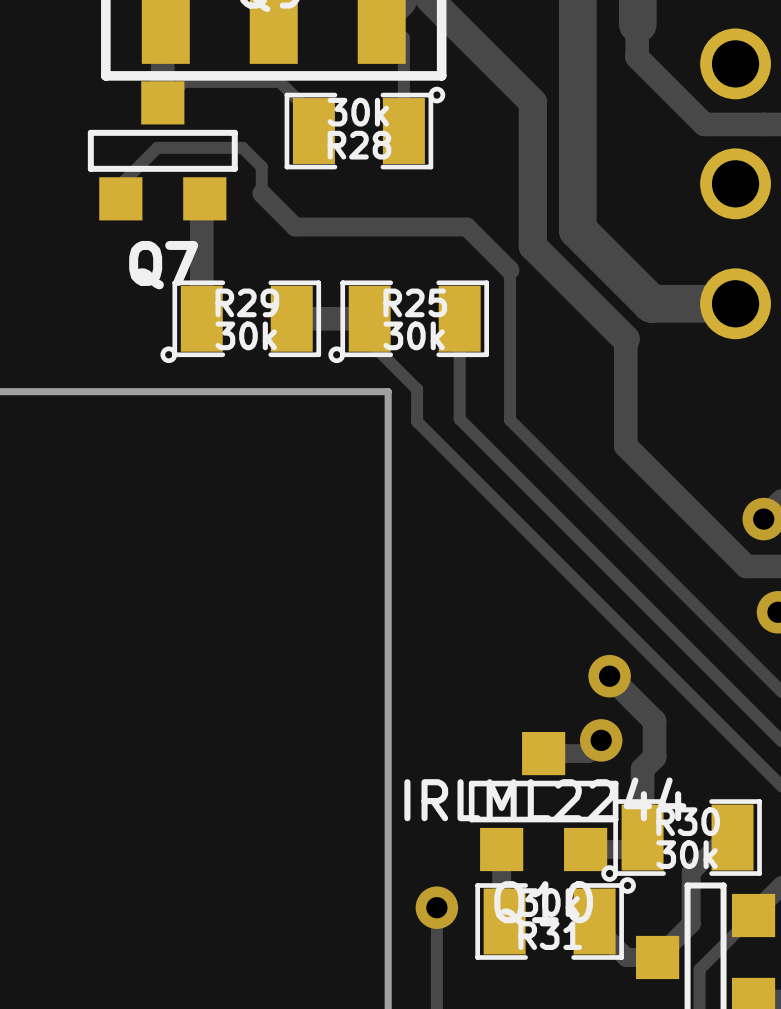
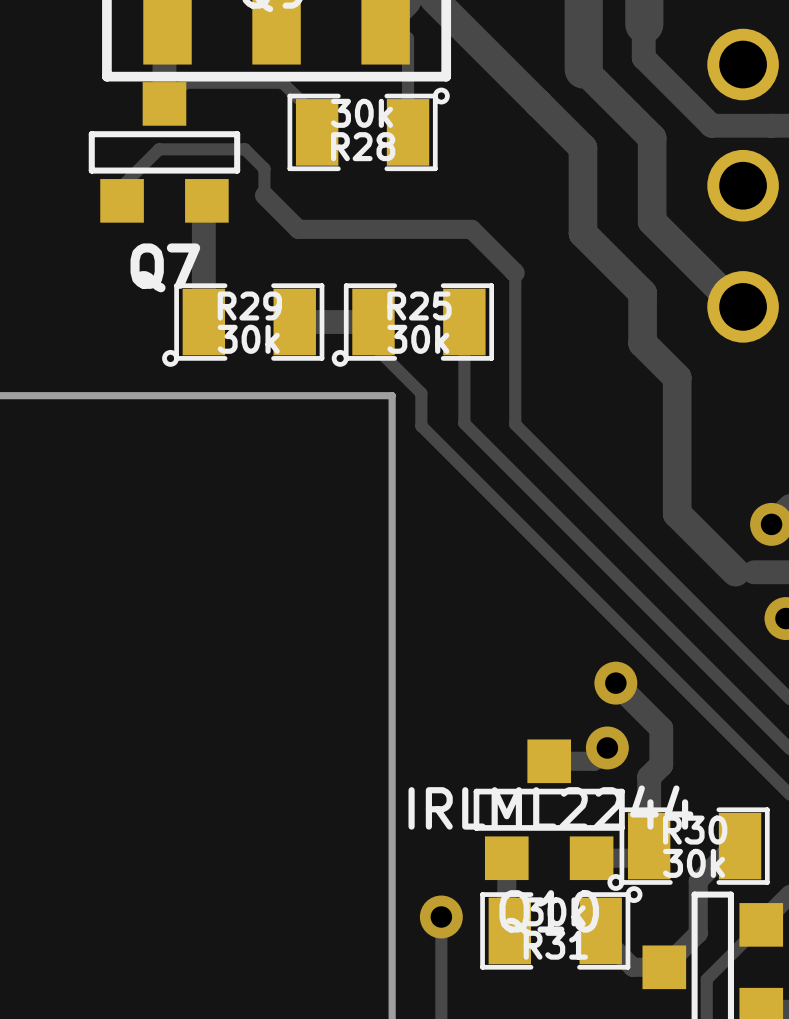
track: (577, 68) (577, 230) (651, 303) (730, 303) -> (583, 69) (652, 138) (652, 221) (737, 306)
track: (532, 102) (532, 246) (625, 339) (625, 445) (746, 566) -> (538, 103) (582, 147) (582, 233) (642, 293) (642, 343) (677, 377) (677, 513) (735, 572)

